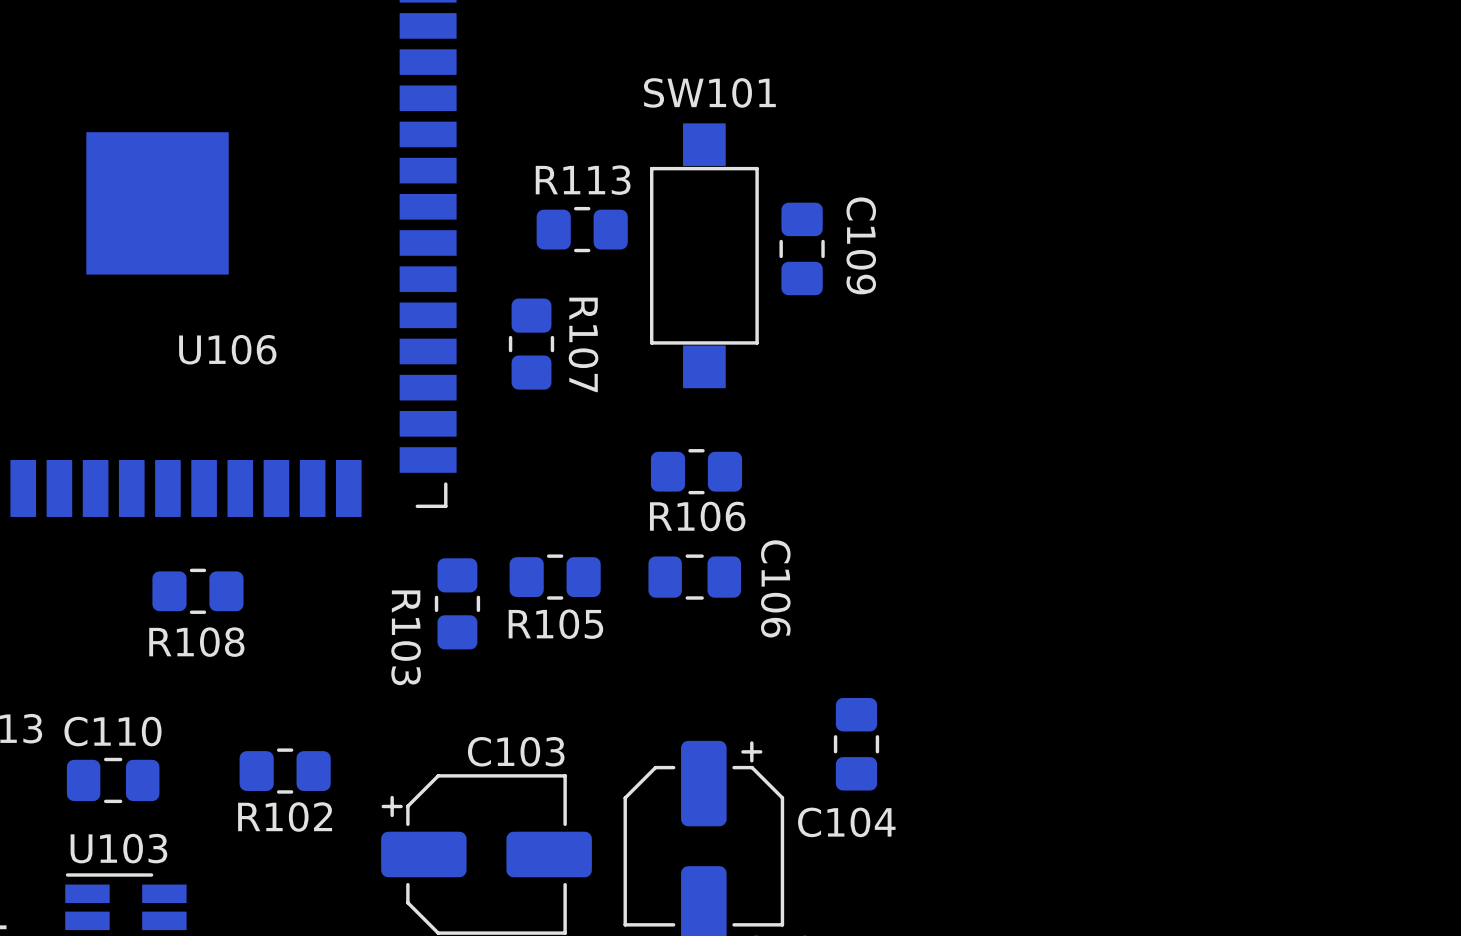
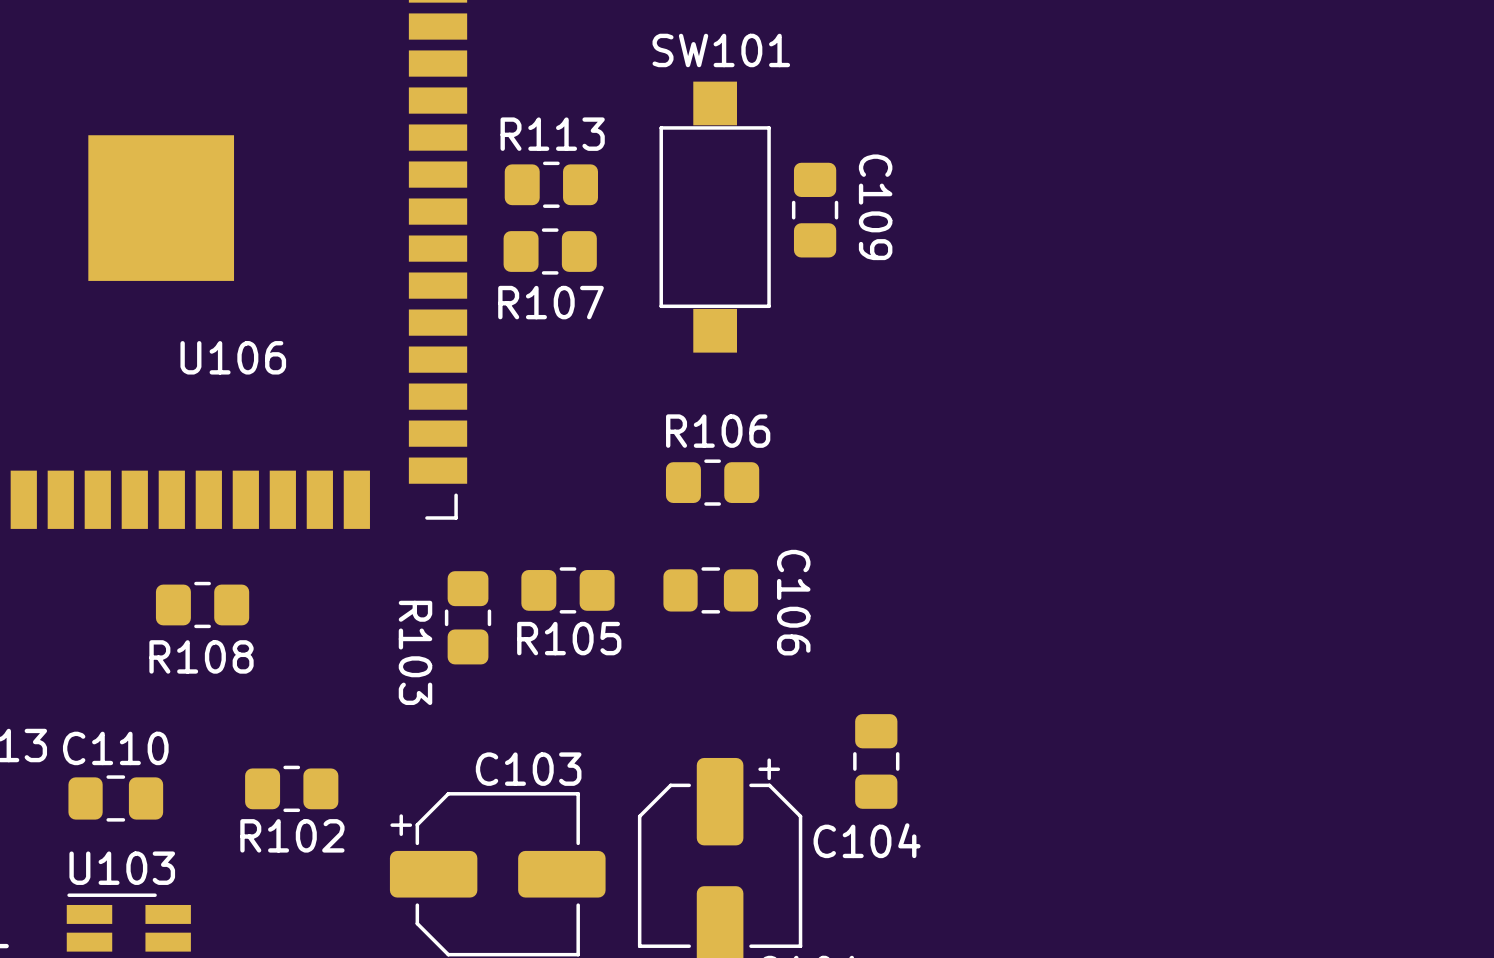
R113 position: (582, 229) -> (551, 184)
C109 position: (802, 248) -> (815, 210)
SW101 position: (704, 255) -> (715, 217)
R107 rotation: 0° (531, 344) -> 90° clockwise (550, 251)
R107 position: (531, 344) -> (550, 251)
R106 name position: R106 (697, 516) -> R106 (718, 431)

